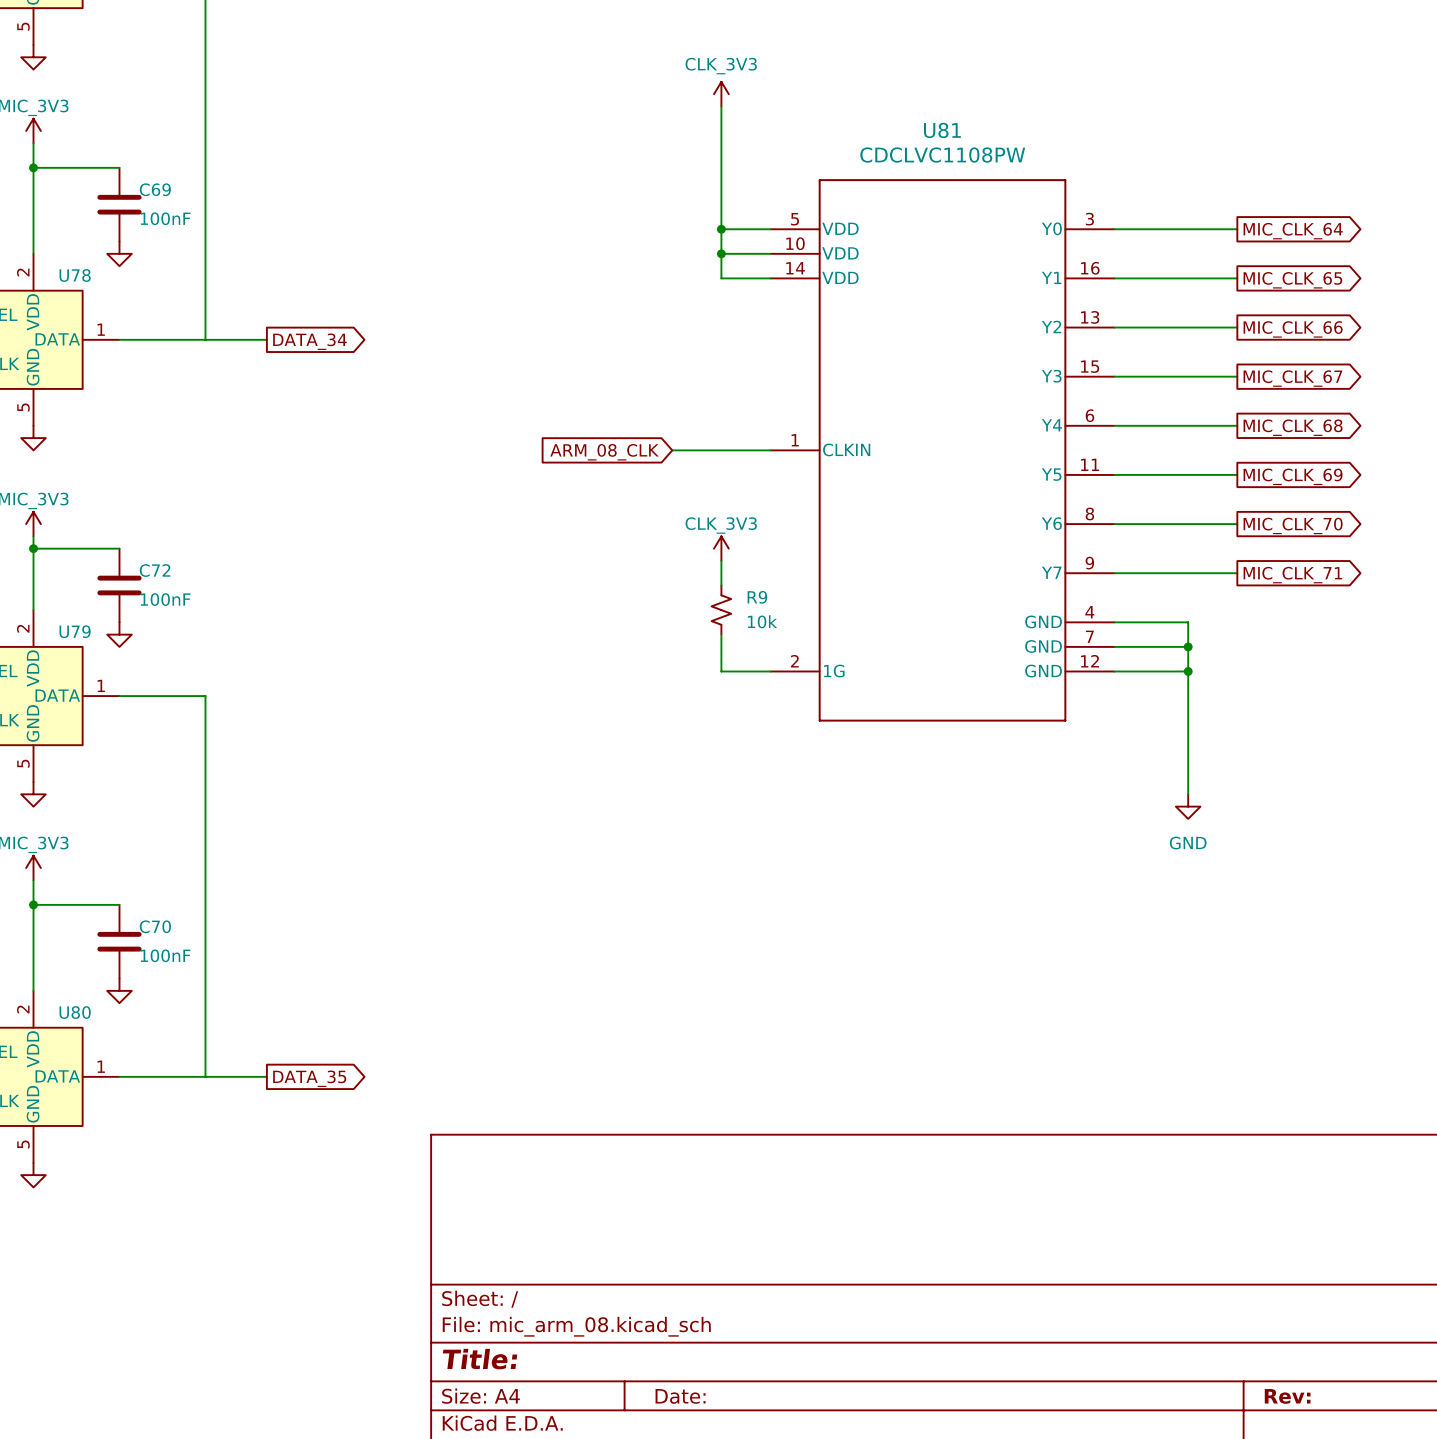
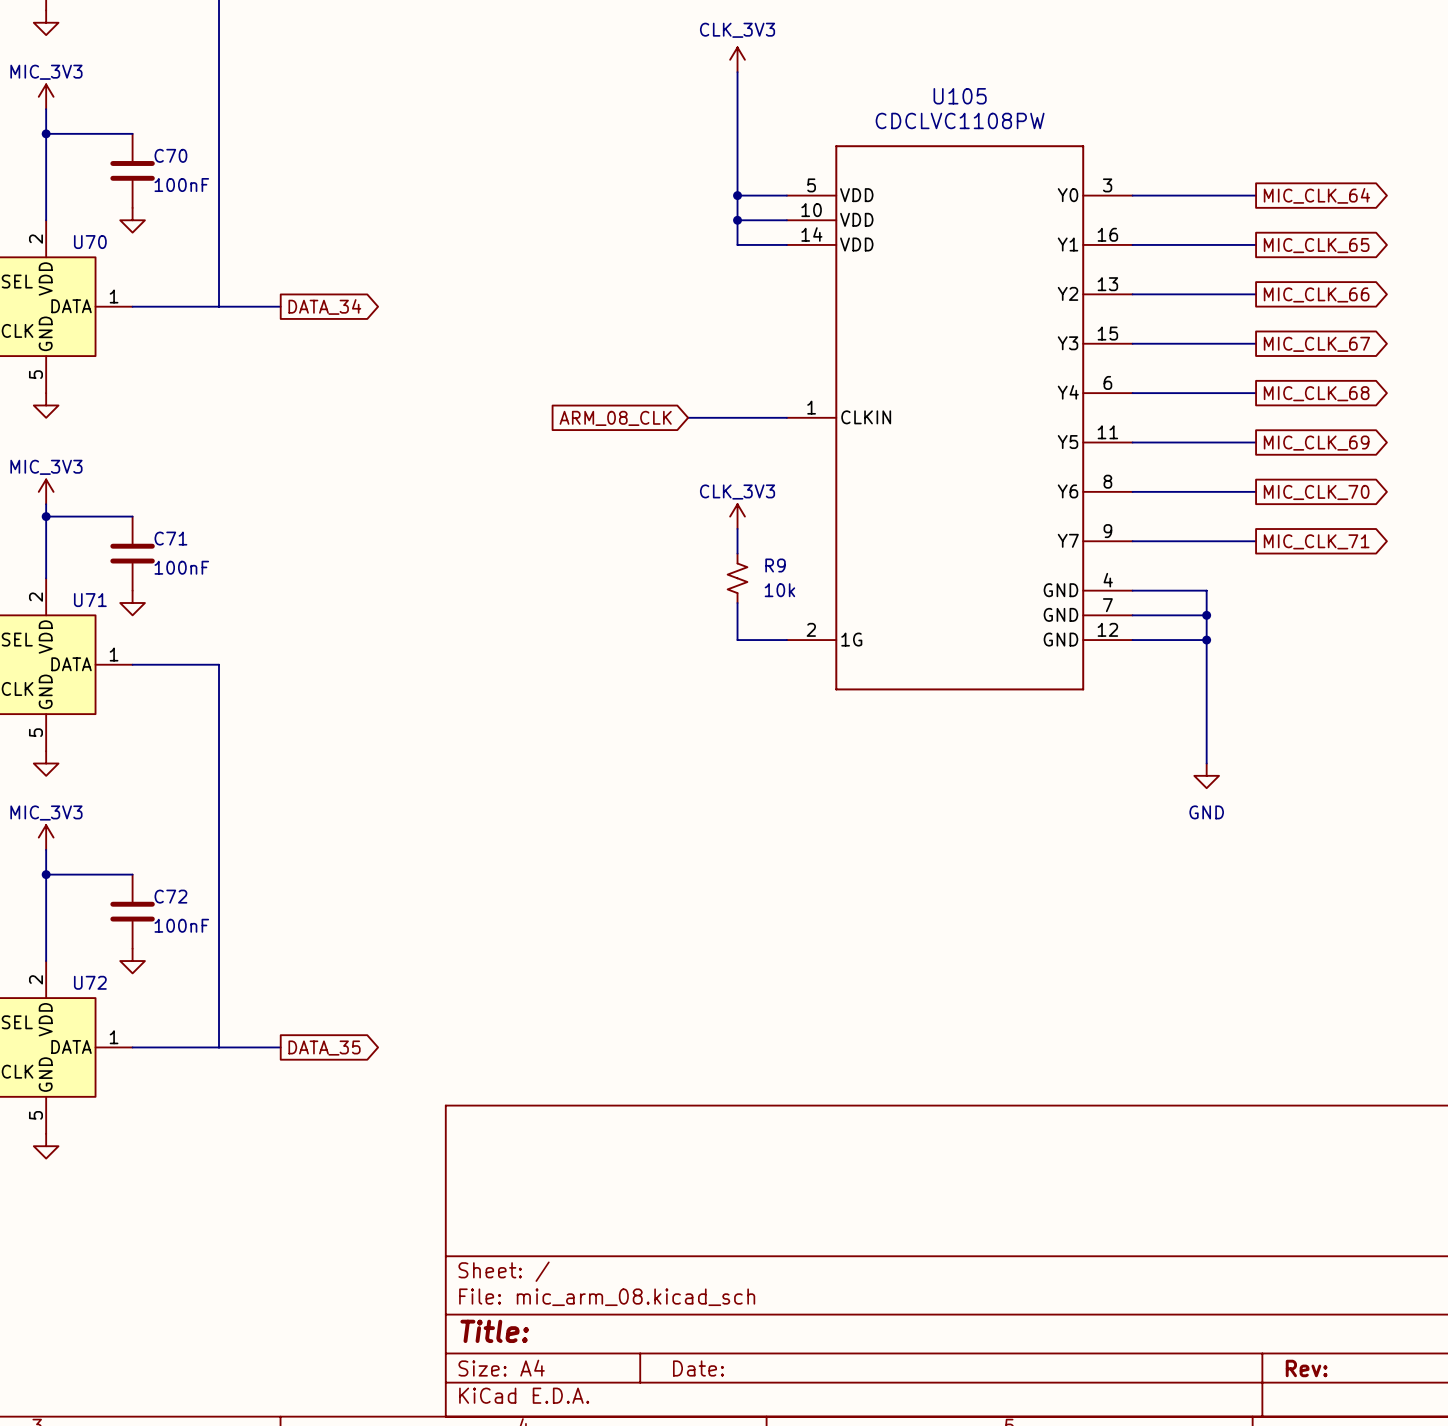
U81 name: U81 (942, 130) -> U105 (960, 96)
C69 name: C69 (155, 189) -> C70 (170, 155)
U78 name: U78 (75, 275) -> U70 (90, 242)
C72 name: C72 (155, 570) -> C71 (170, 538)
U79 name: U79 (75, 631) -> U71 (90, 600)
C70 name: C70 (155, 926) -> C72 (170, 896)
U80 name: U80 (75, 1012) -> U72 (90, 982)

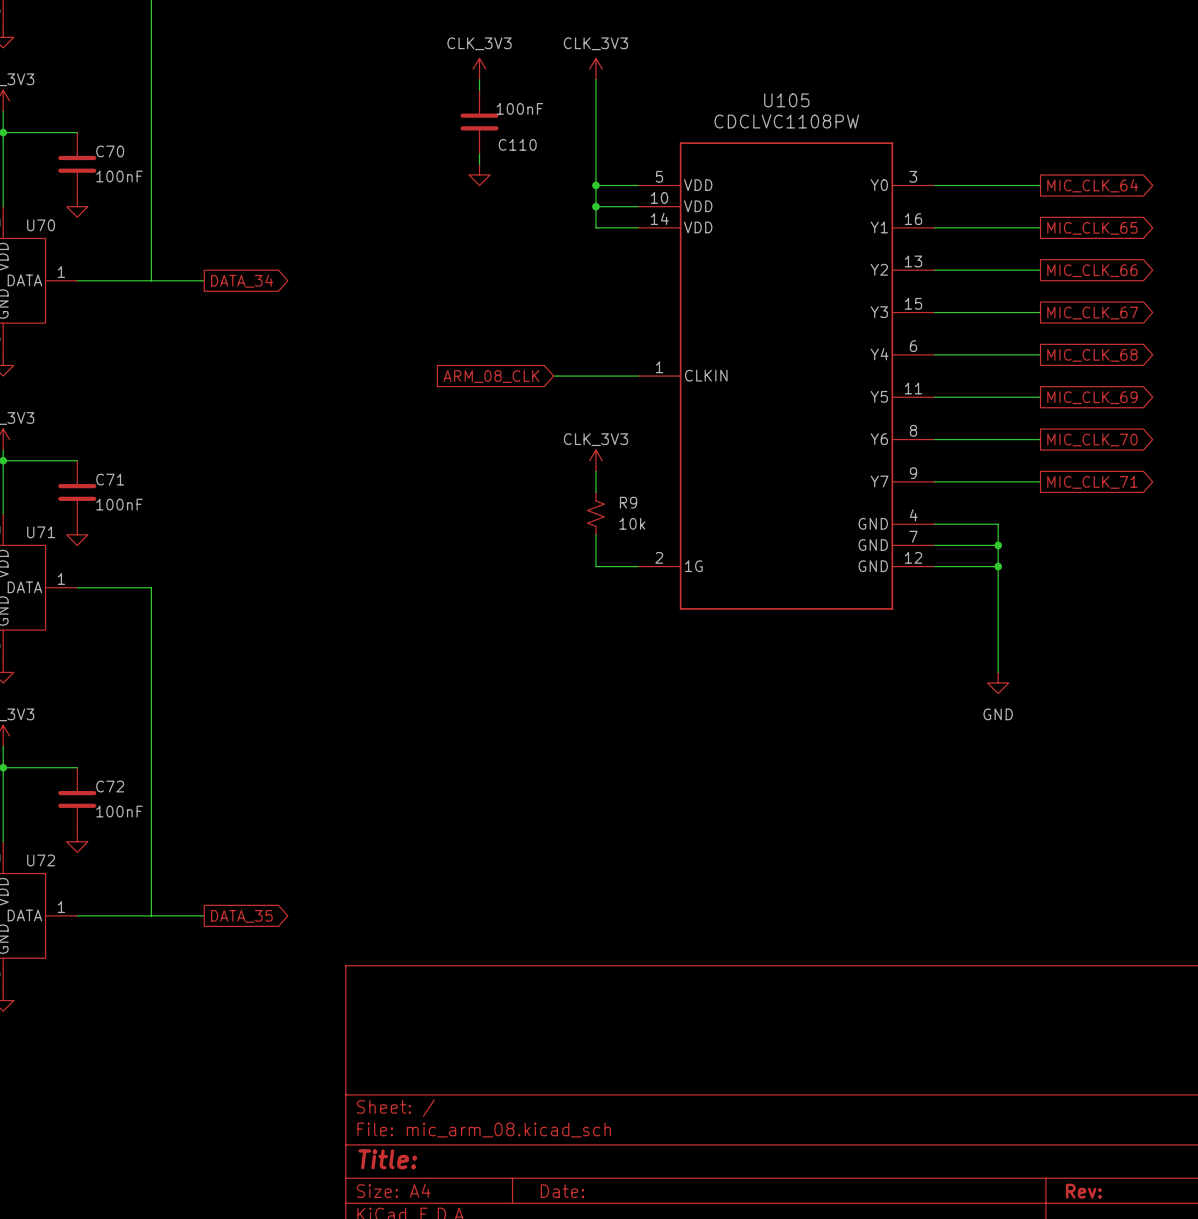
power symbol: none -> CLK_3V3 (479, 69)
wire: none -> (479, 79) (479, 90)
C110: none -> 100nF (479, 122)
wire: none -> (479, 153) (479, 164)
power symbol: none -> (479, 174)

